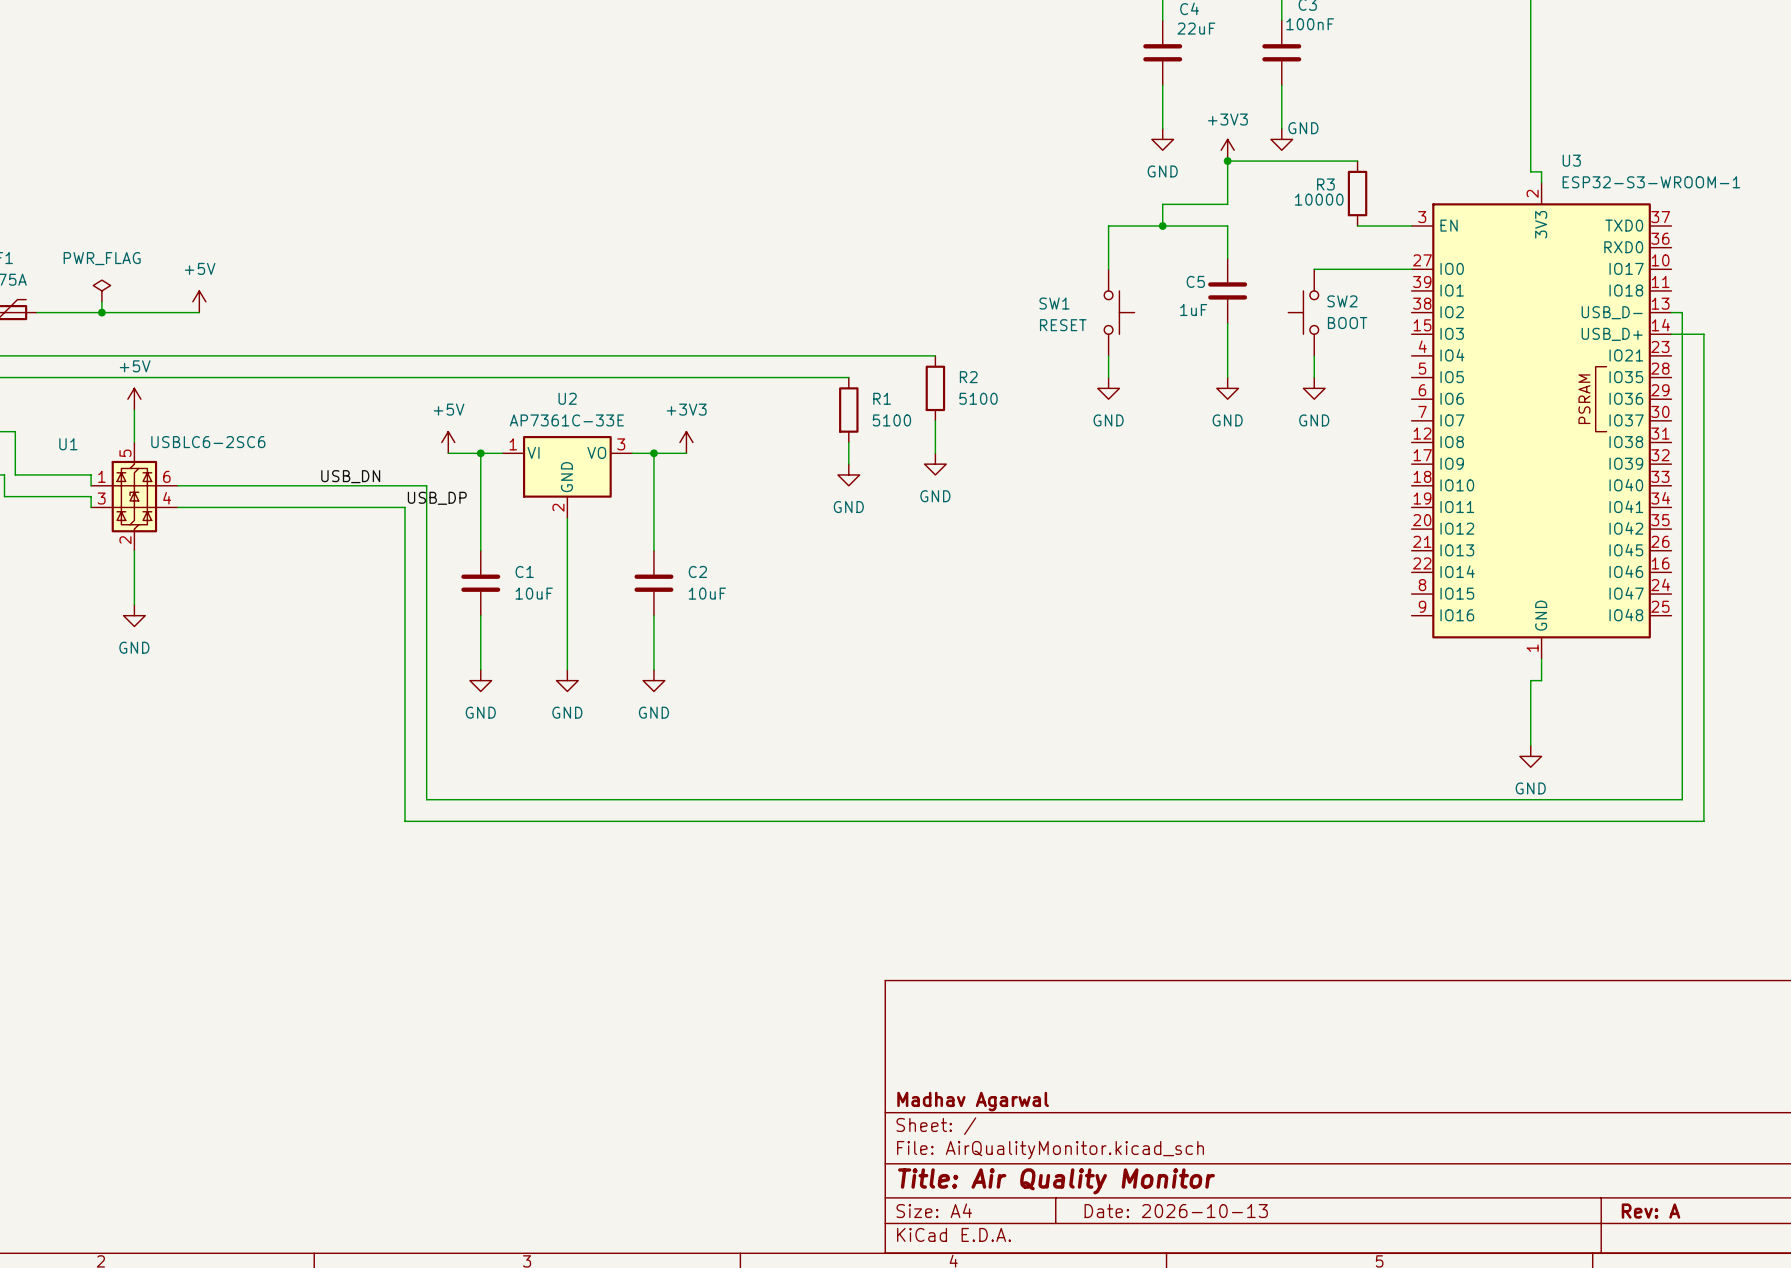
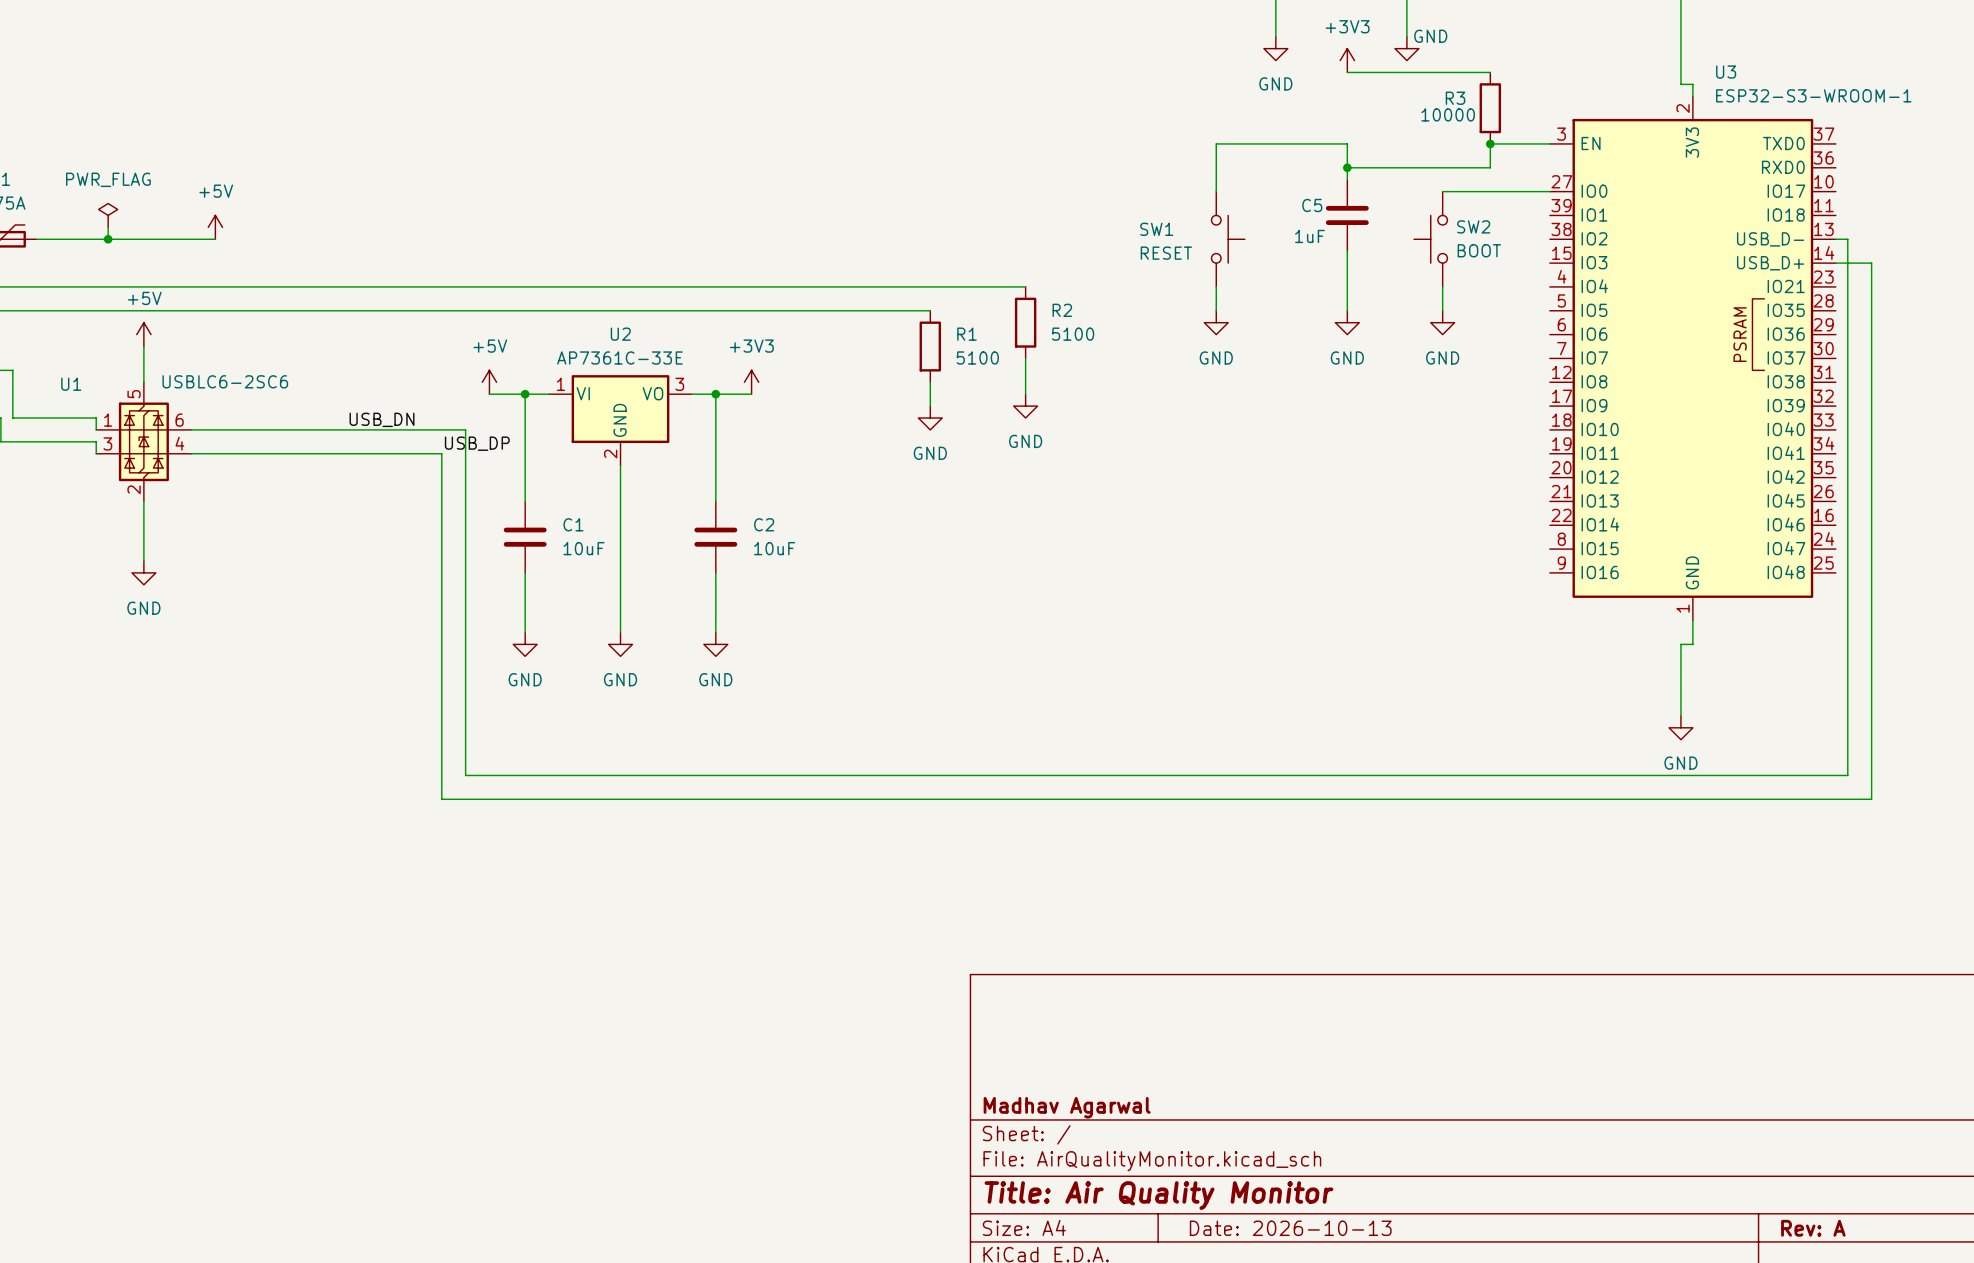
wire: (1227, 161) (1227, 204) (1162, 204) (1162, 226) -> none
junction: (1227, 161) -> none
junction: (1162, 226) -> none
wire: none -> (1490, 143) (1490, 167) (1347, 167)
junction: none -> (1490, 143)
junction: none -> (1347, 167)

